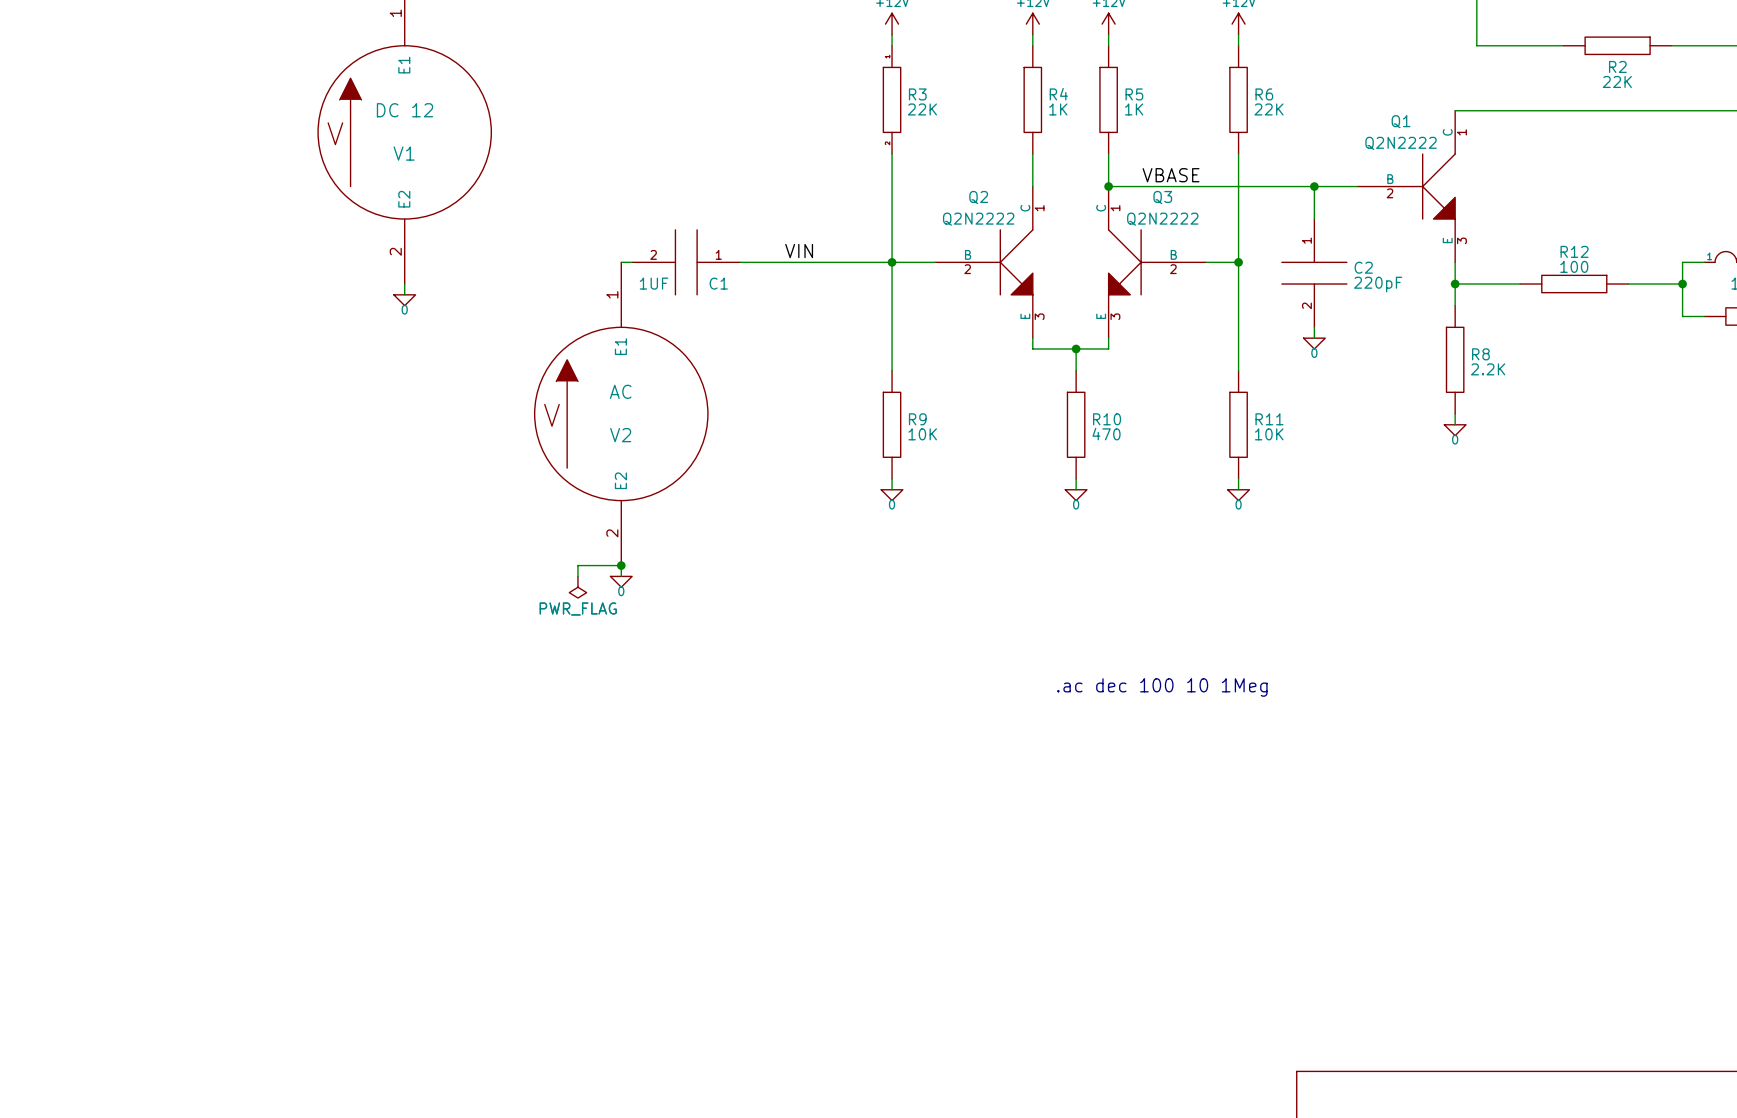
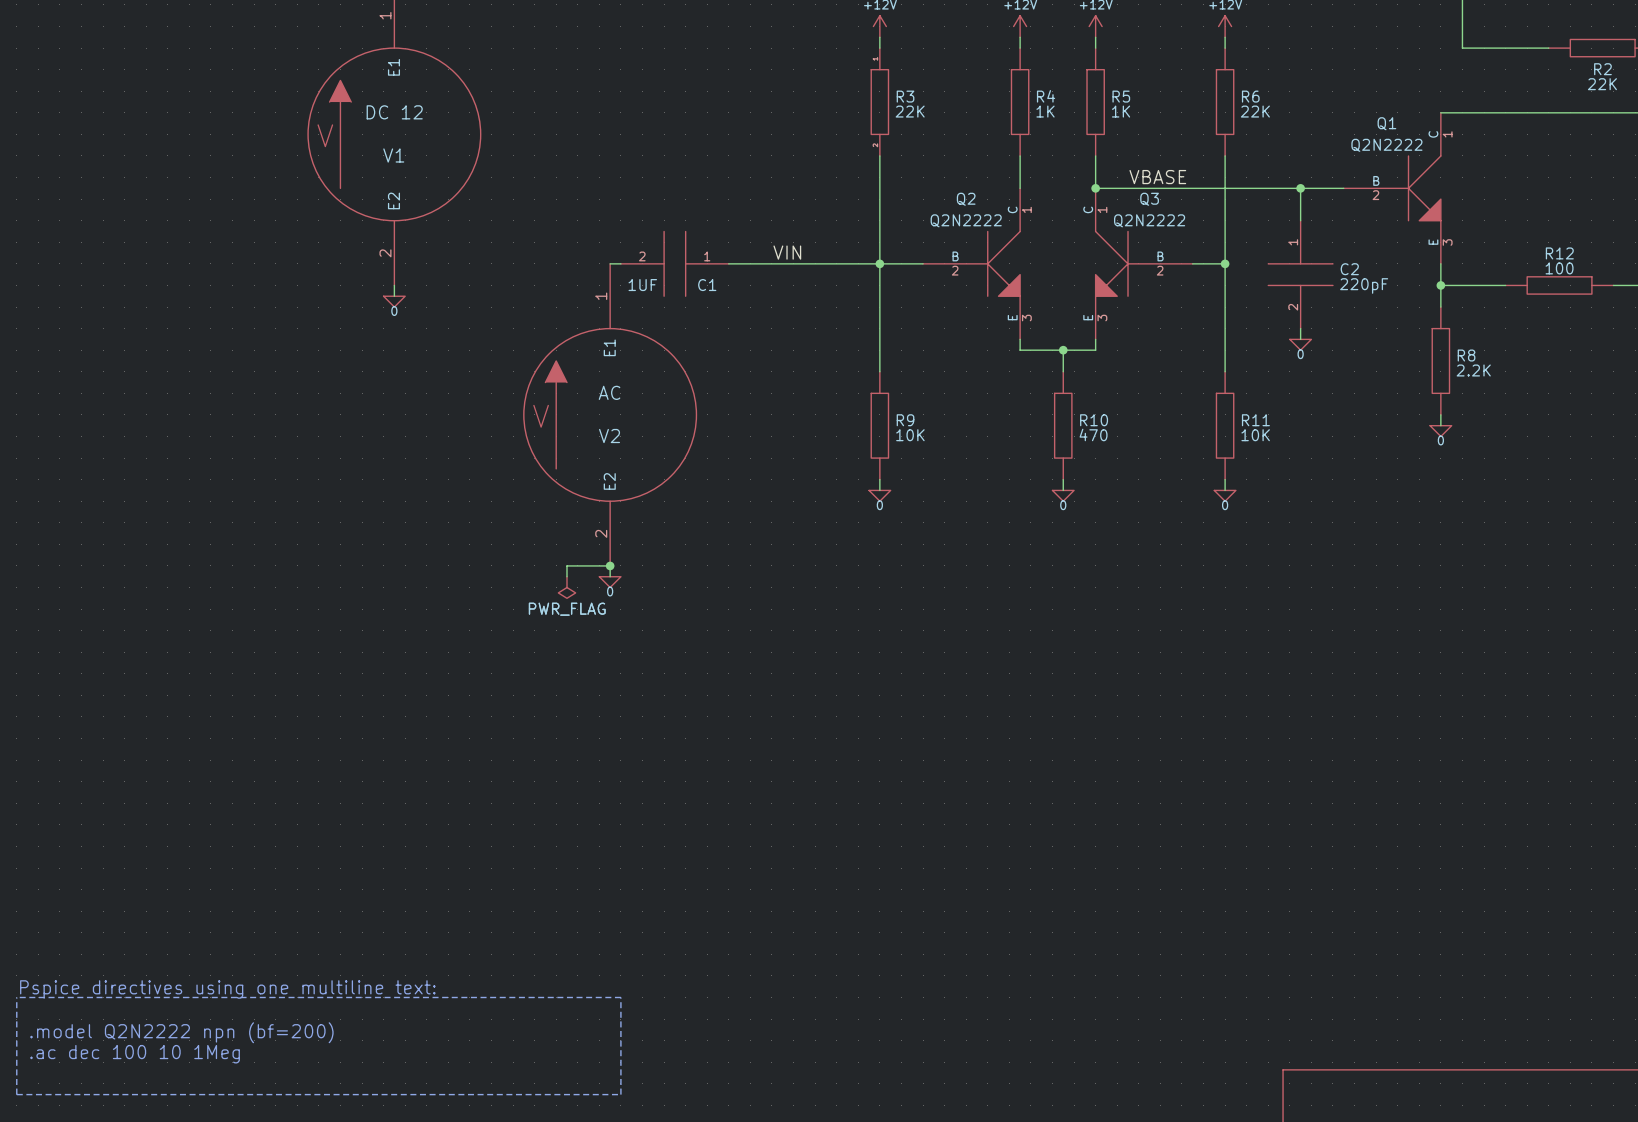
text: .ac dec 100 10 1Meg (1162, 687) -> none
text: none -> Pspice directives using one multiline text: (227, 989)
line: none -> (16, 997) (620, 997) (620, 1094) (16, 1094) (16, 997)
text: none -> .model Q2N2222 npn (bf=200) (181, 1032)
text: none -> .ac dec 100 10 1Meg (135, 1054)

